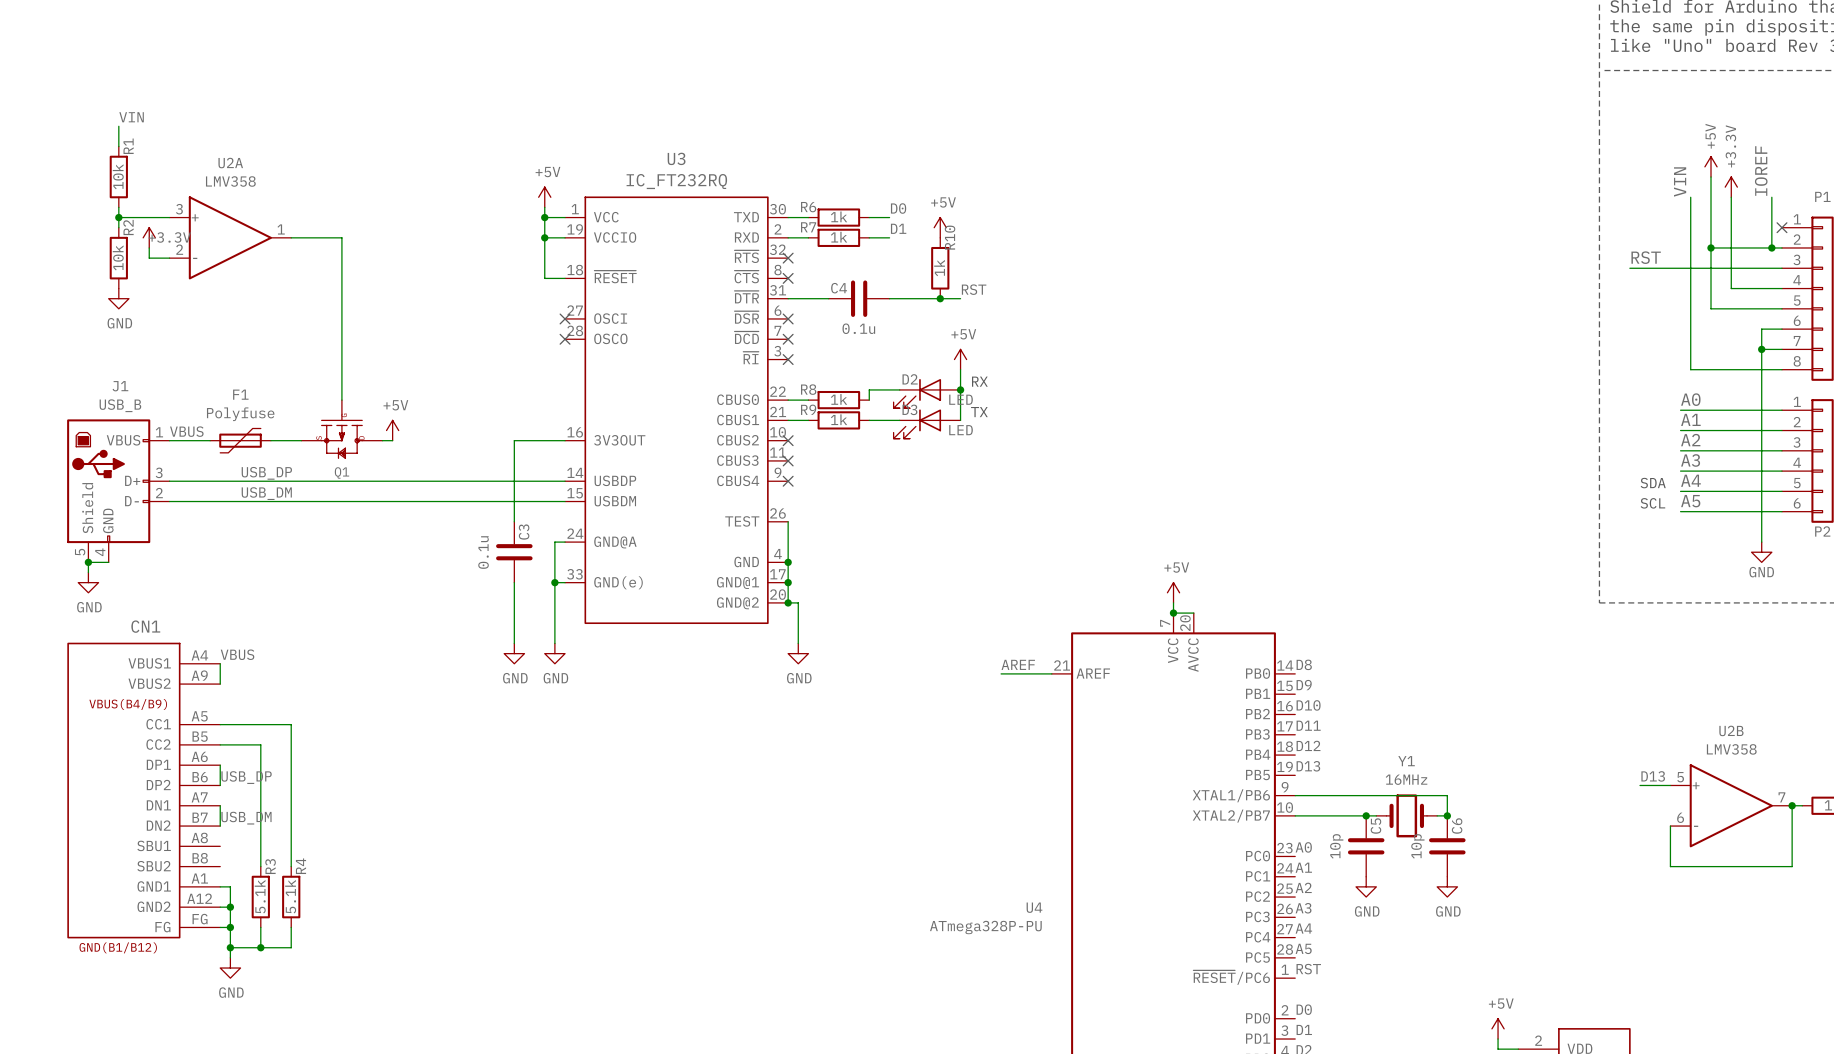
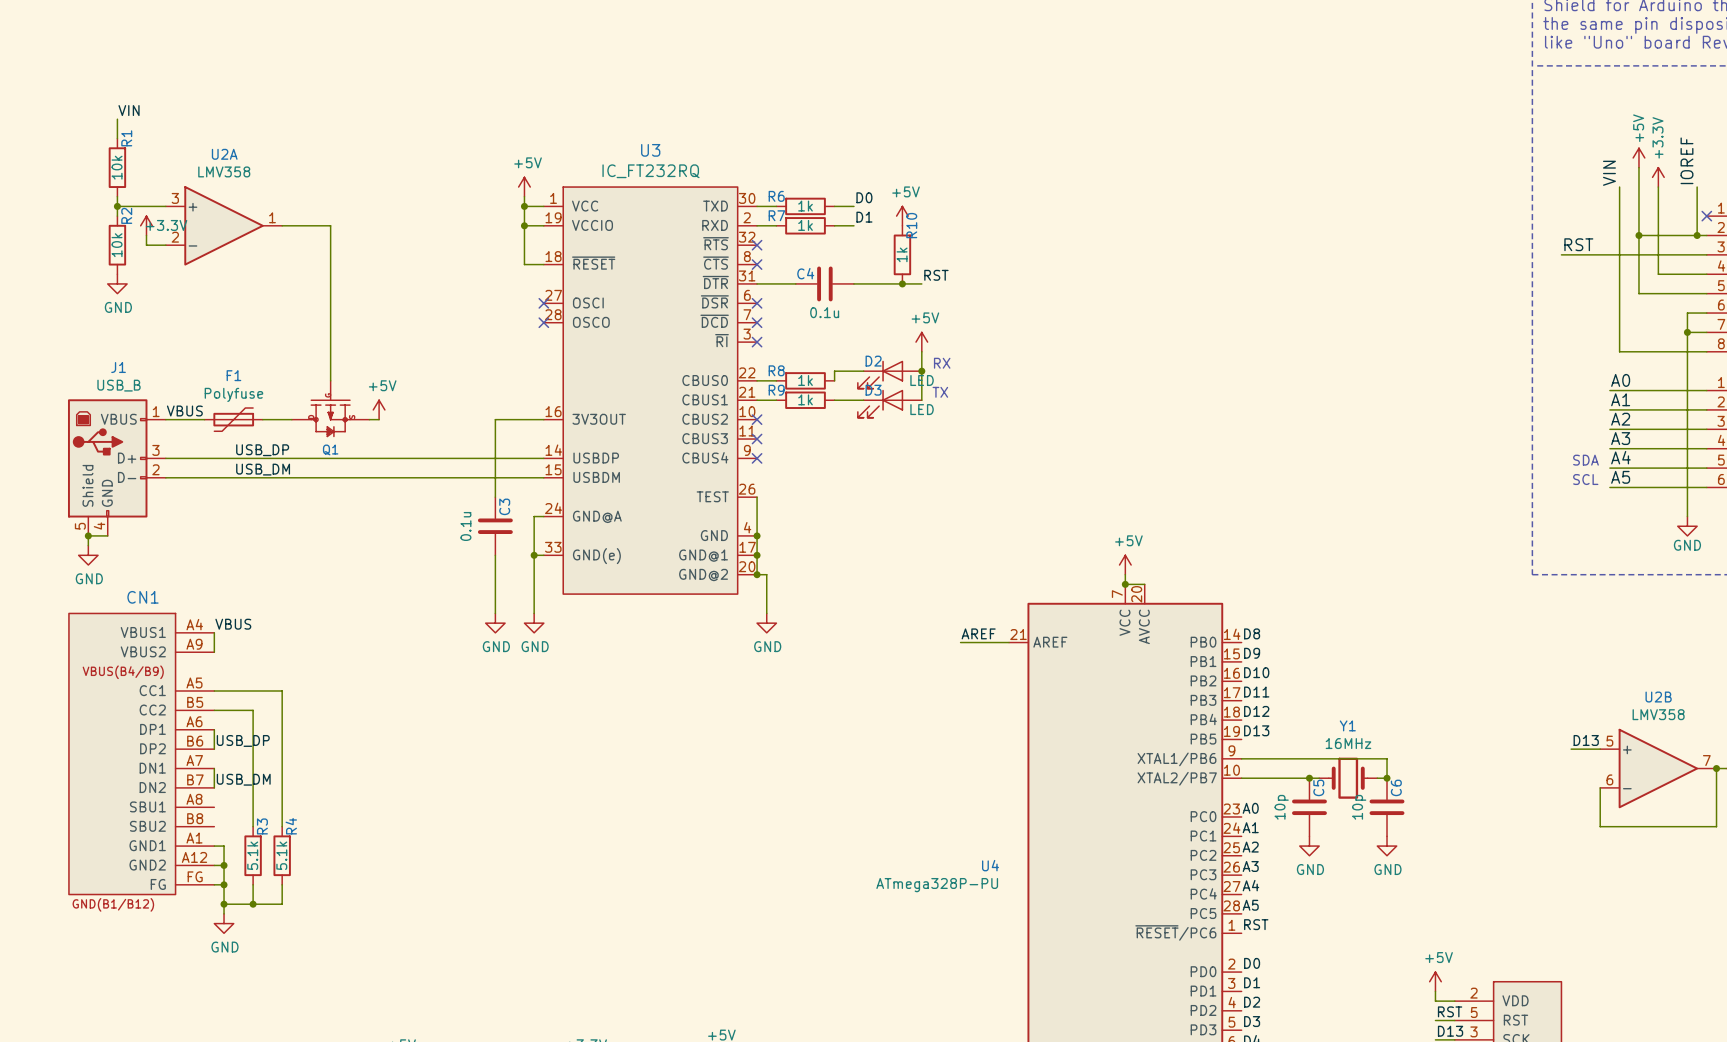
Q1 flip: as is (341, 439) -> left-right (330, 418)

